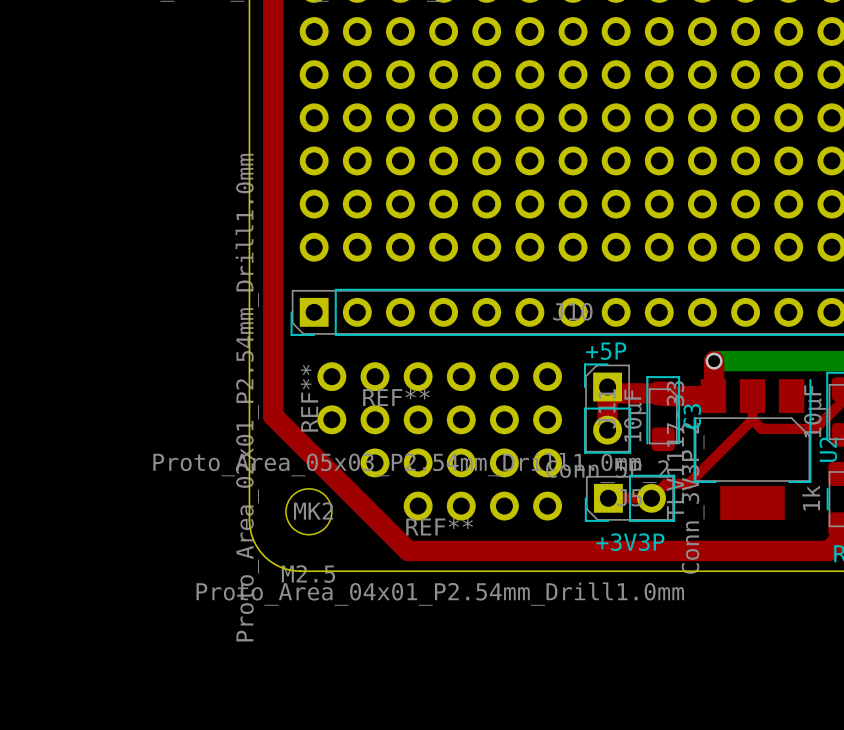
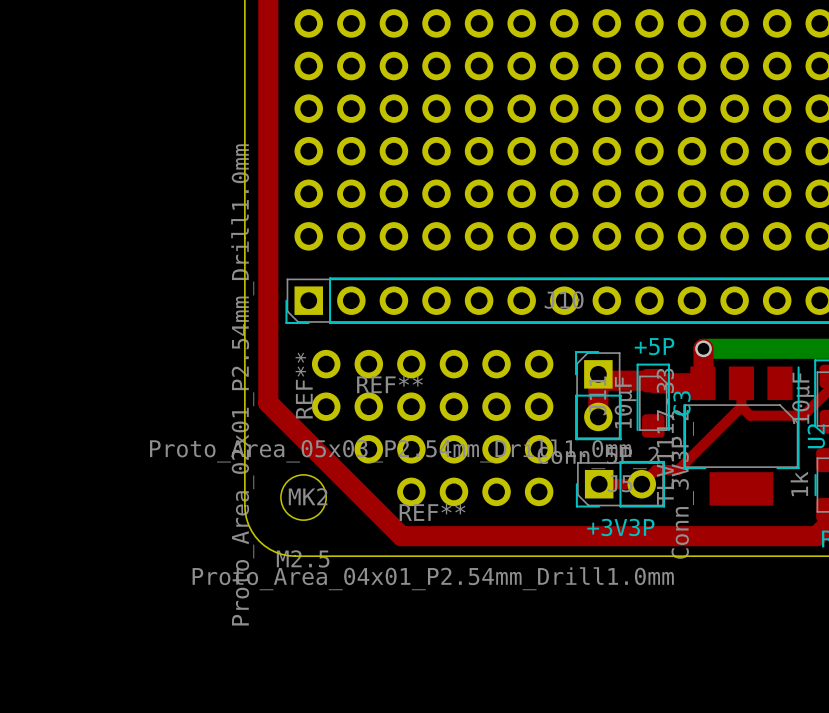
text position: +5P (606, 351) -> +5P (654, 346)

